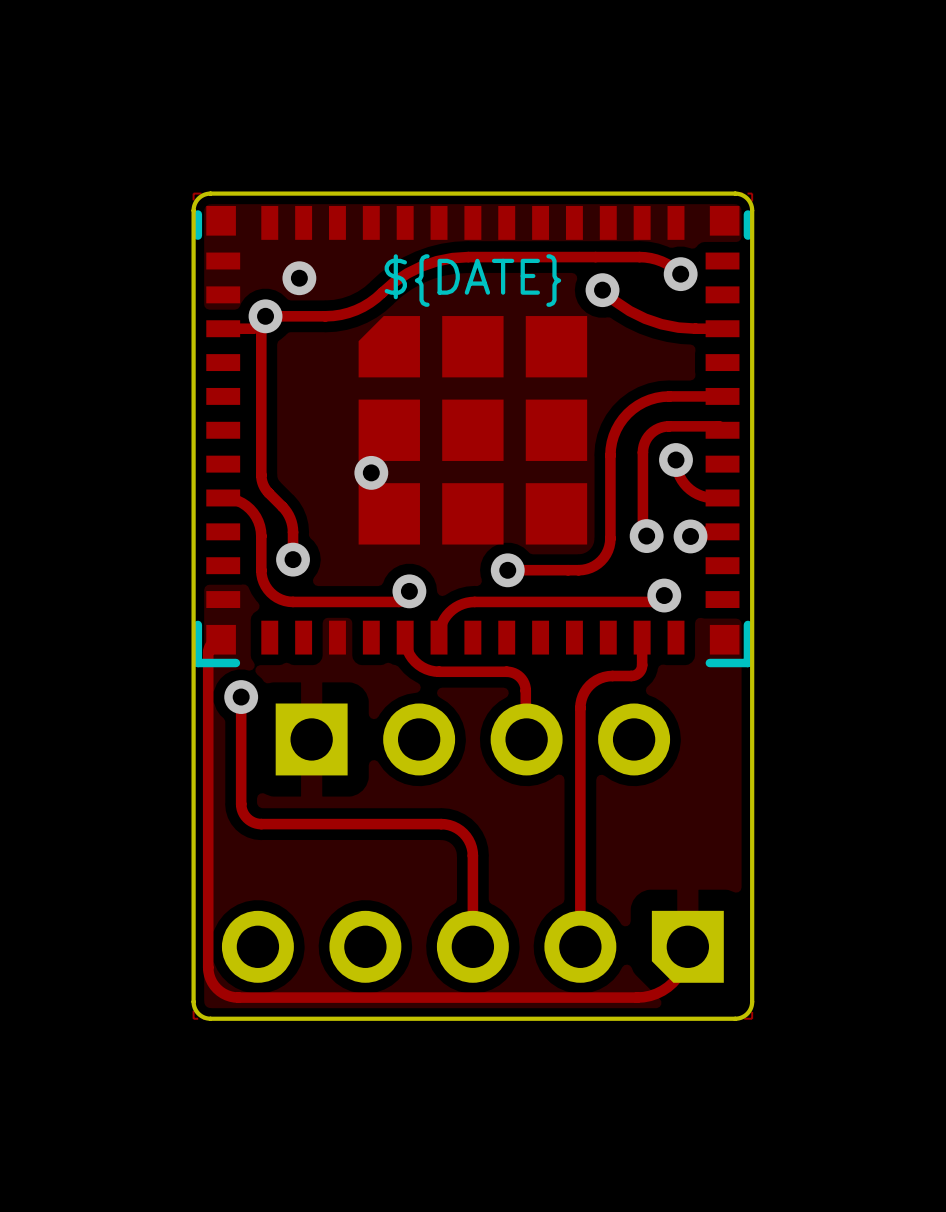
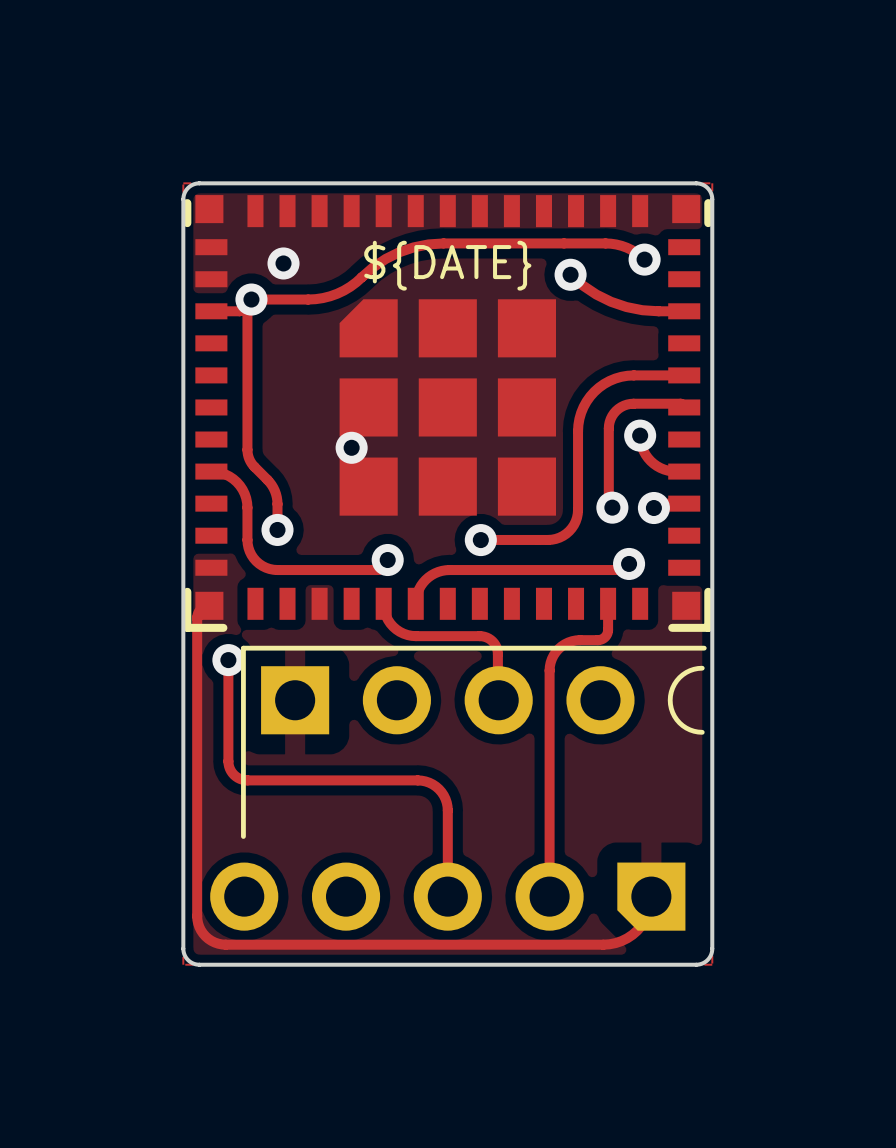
line: none -> (704, 648) (243, 648) (243, 836)
line: none -> (702, 668) (690, 670) (679, 677) (672, 687) (670, 700) (672, 712) (679, 722) (690, 729) (702, 732)

